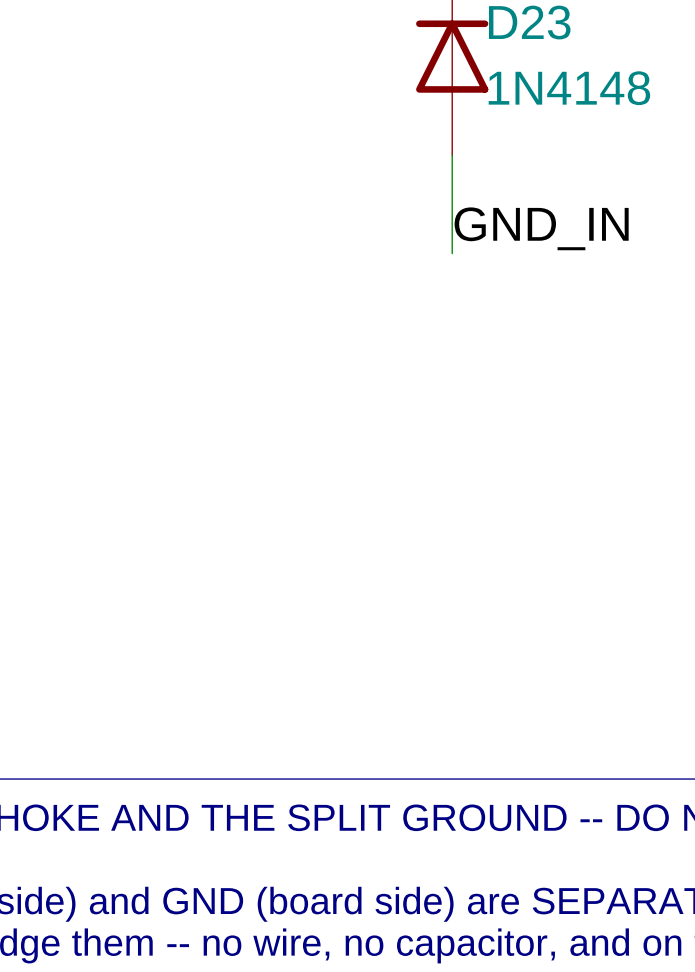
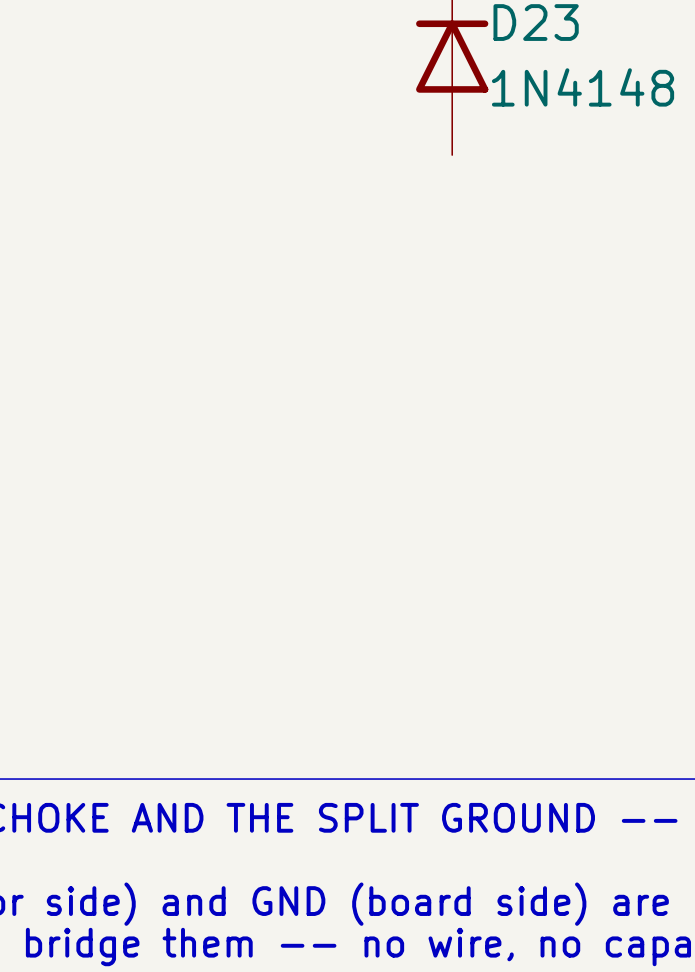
wire: (452, 155) (452, 253) -> none
label: GND_IN (541, 228) -> none

